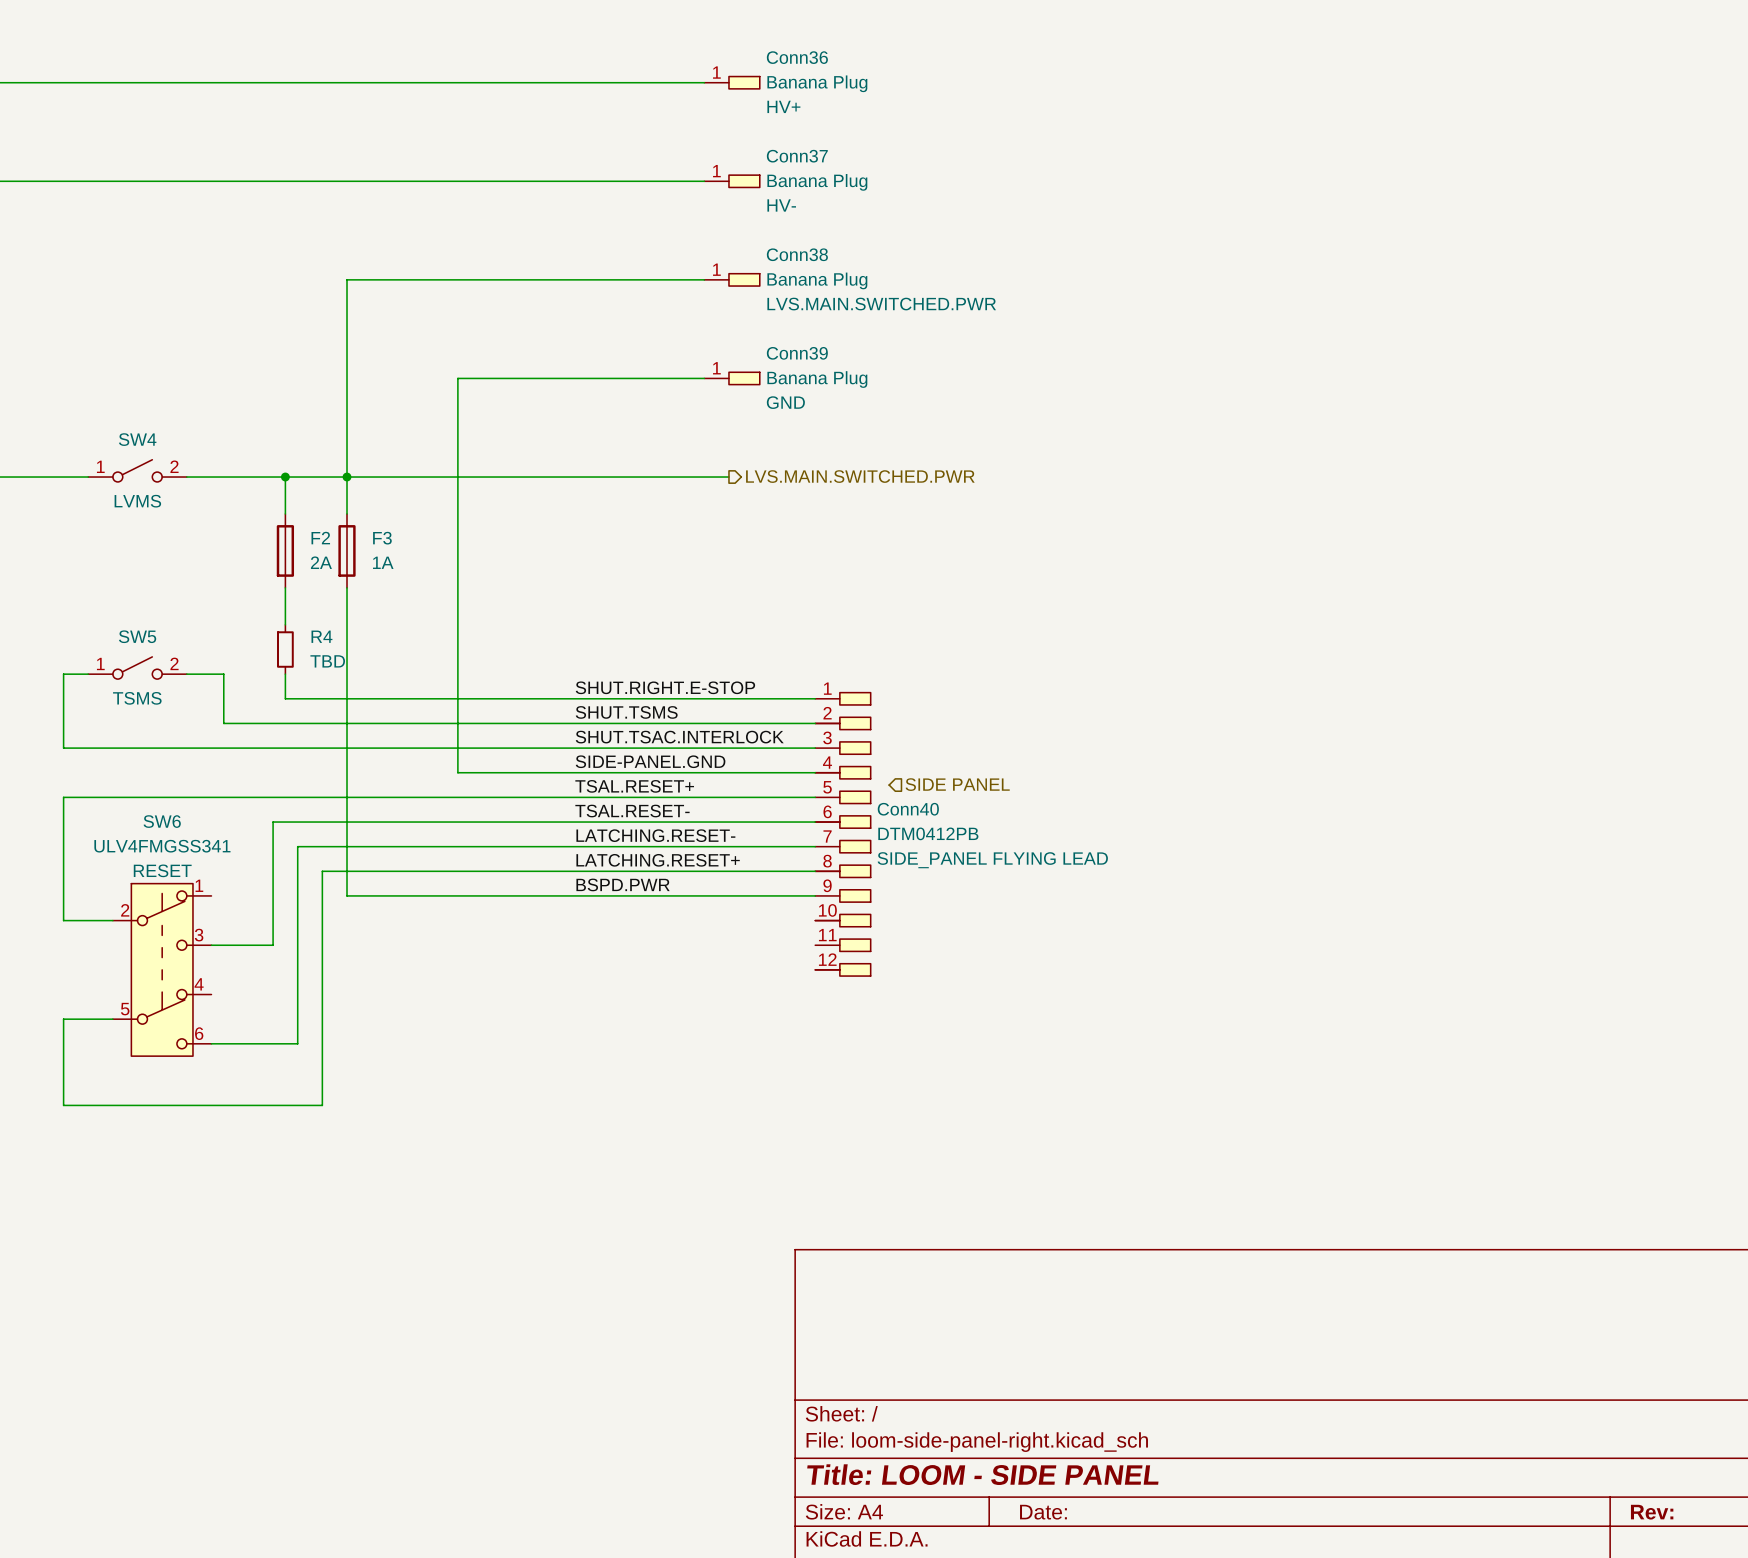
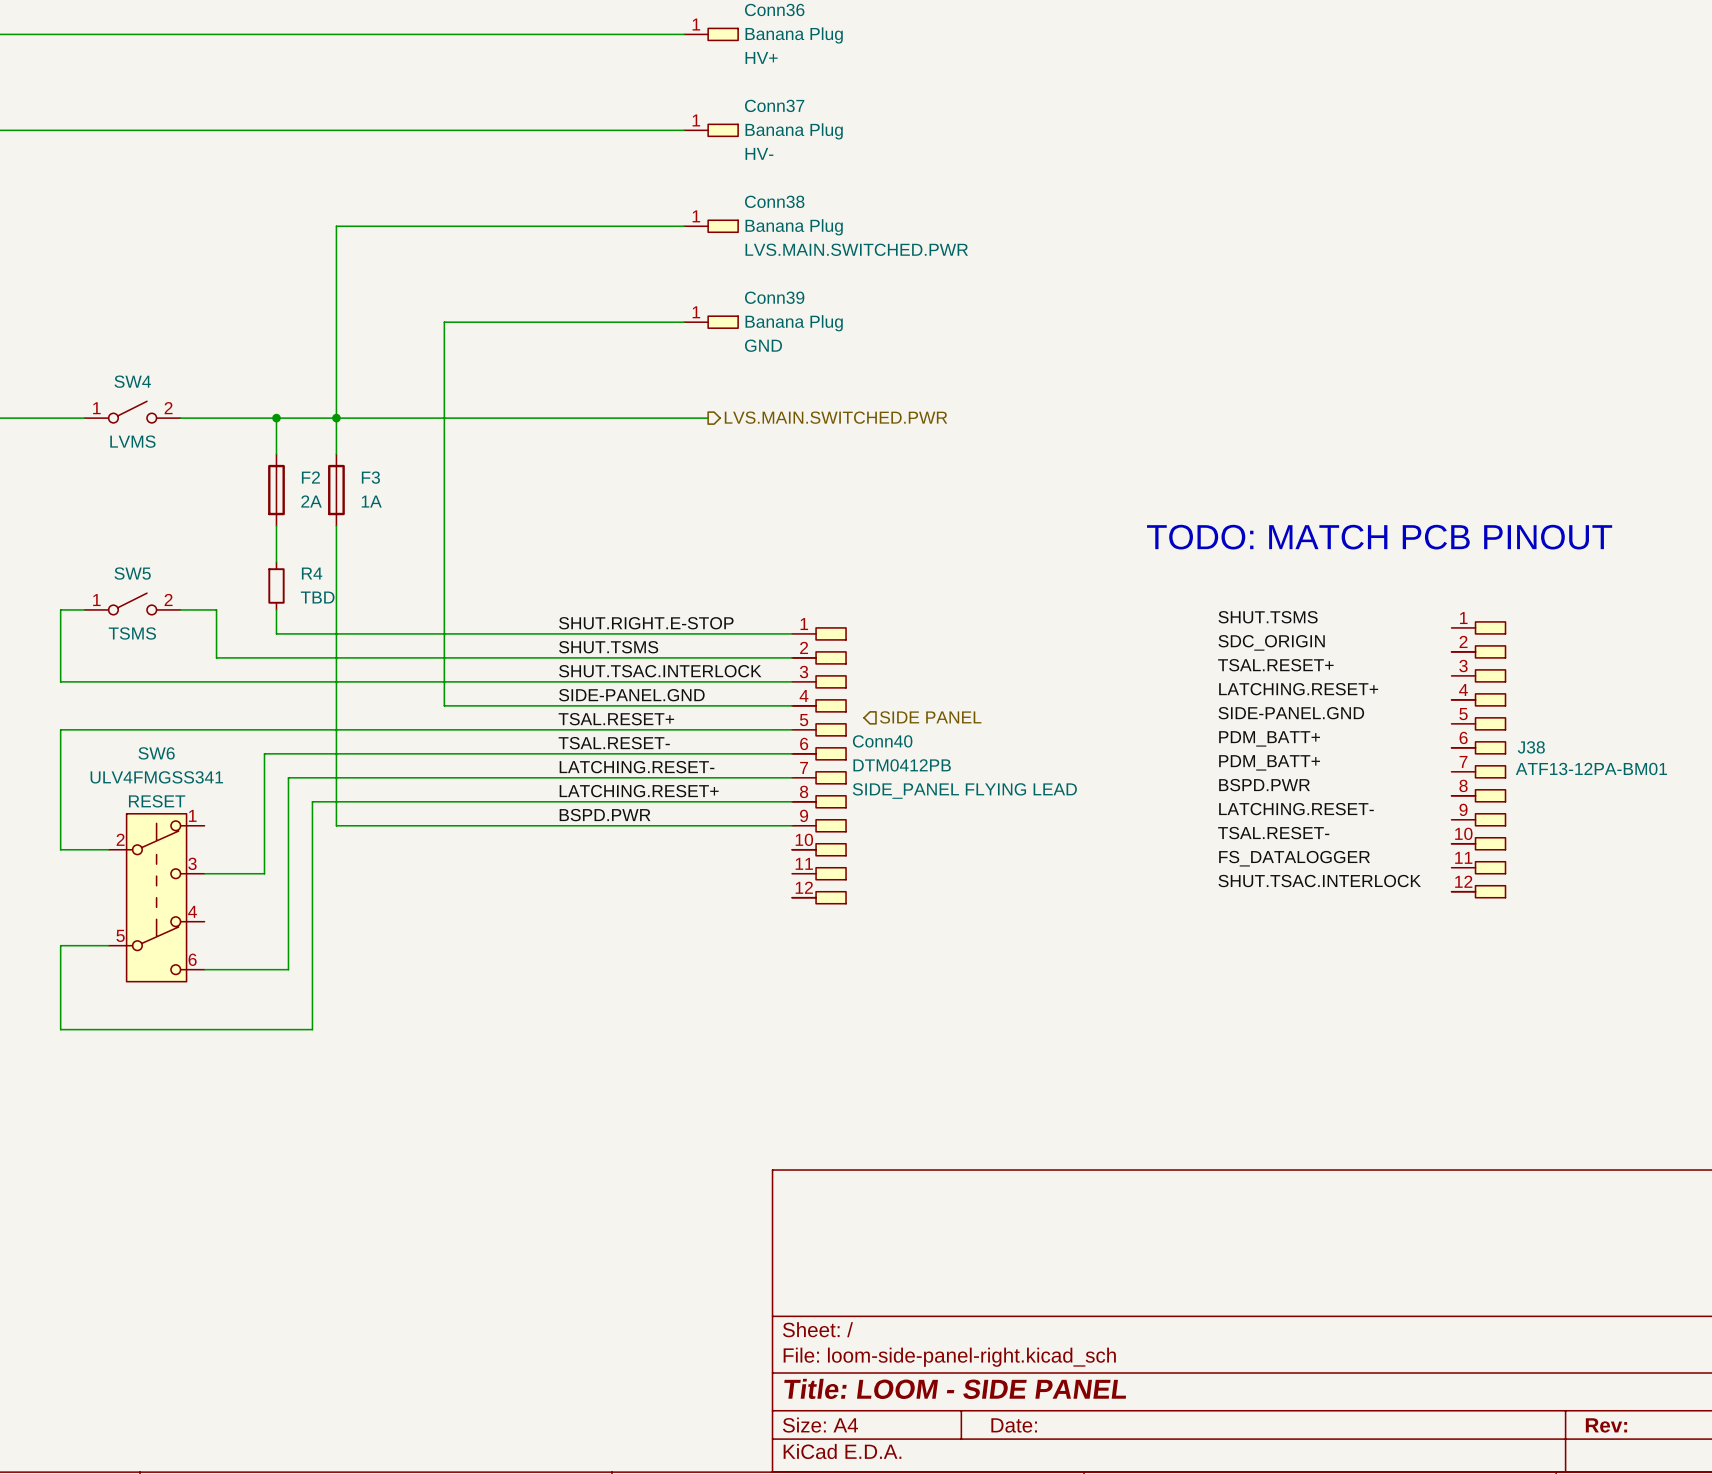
text: none -> TODO: MATCH PCB PINOUT (1379, 537)
label: none -> SHUT.TSMS (1268, 617)
label: none -> SDC_ORIGIN (1271, 642)
label: none -> TSAL.RESET+ (1275, 665)
label: none -> LATCHING.RESET+ (1298, 689)
label: none -> SIDE-PANEL.GND (1291, 713)
label: none -> PDM_BATT+ (1269, 738)
J38: none -> ATF13-12PA-BM01 (1478, 759)
label: none -> PDM_BATT+ (1269, 762)
label: none -> BSPD.PWR (1264, 785)
label: none -> LATCHING.RESET- (1296, 809)
label: none -> TSAL.RESET- (1273, 833)
label: none -> FS_DATALOGGER (1294, 858)
label: none -> SHUT.TSAC.INTERLOCK (1319, 881)

